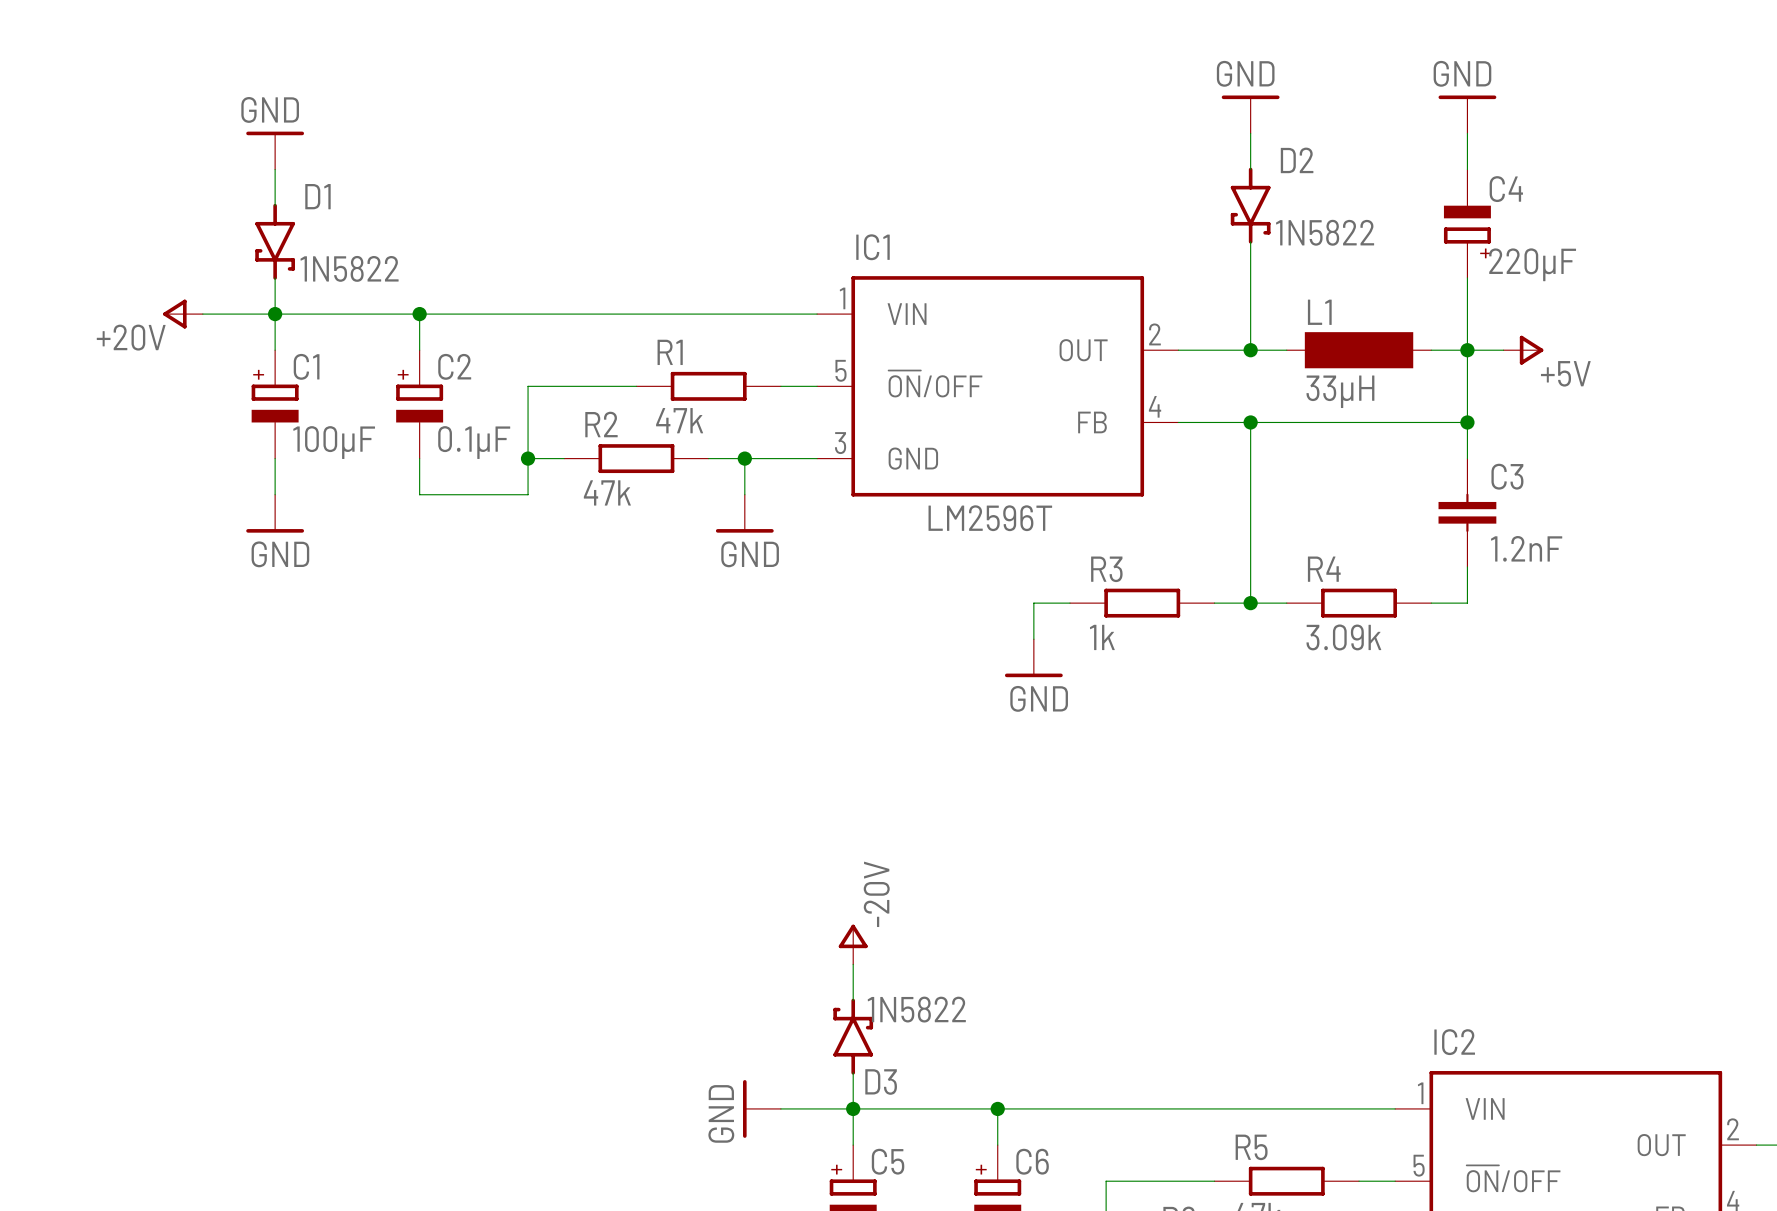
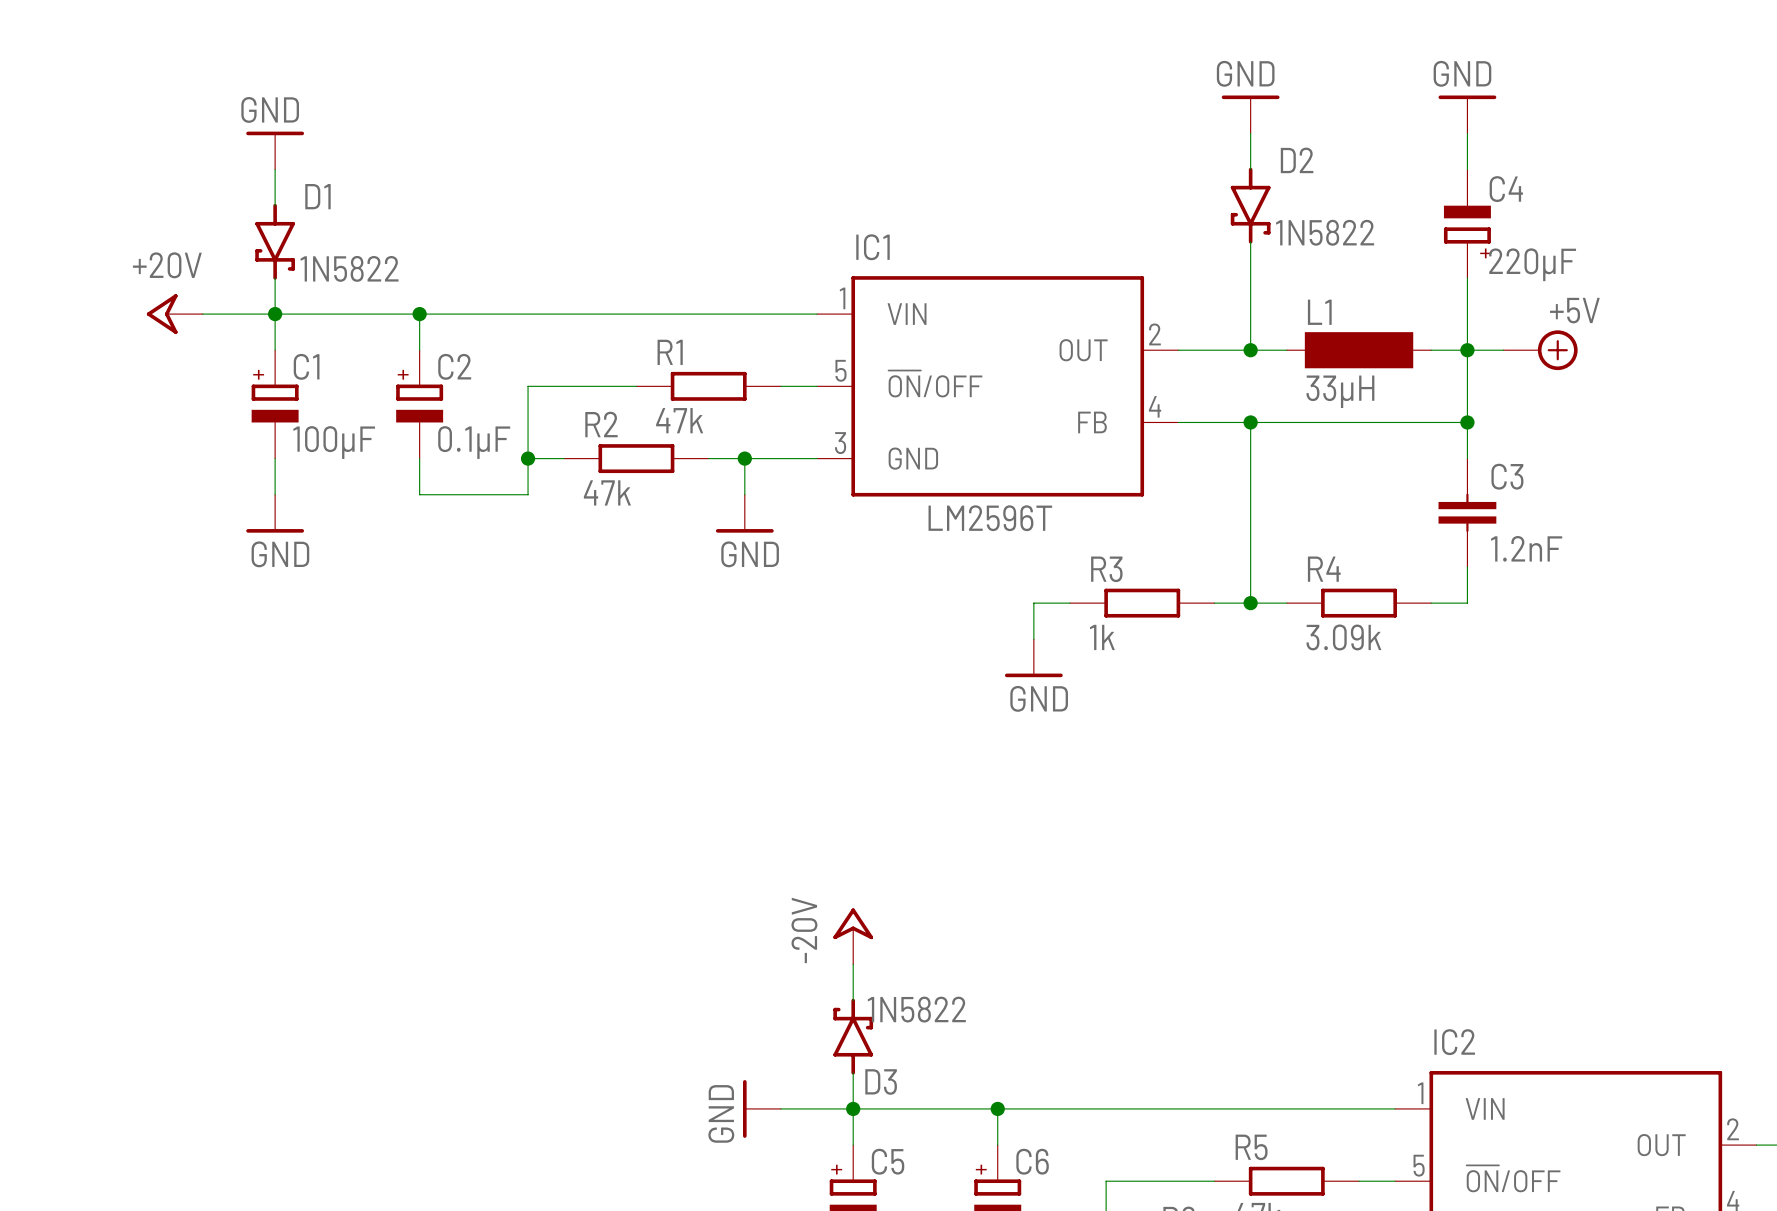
power symbol shape: [163, 299, 203, 329] -> [146, 294, 203, 334]
power symbol text position: +20V (131, 337) -> +20V (167, 265)
power symbol: +5V (1523, 350) -> none
power symbol: none -> +5V (1540, 350)
power symbol text position: -20V (876, 894) -> -20V (804, 930)
power symbol shape: [838, 924, 868, 965] -> [833, 908, 874, 965]

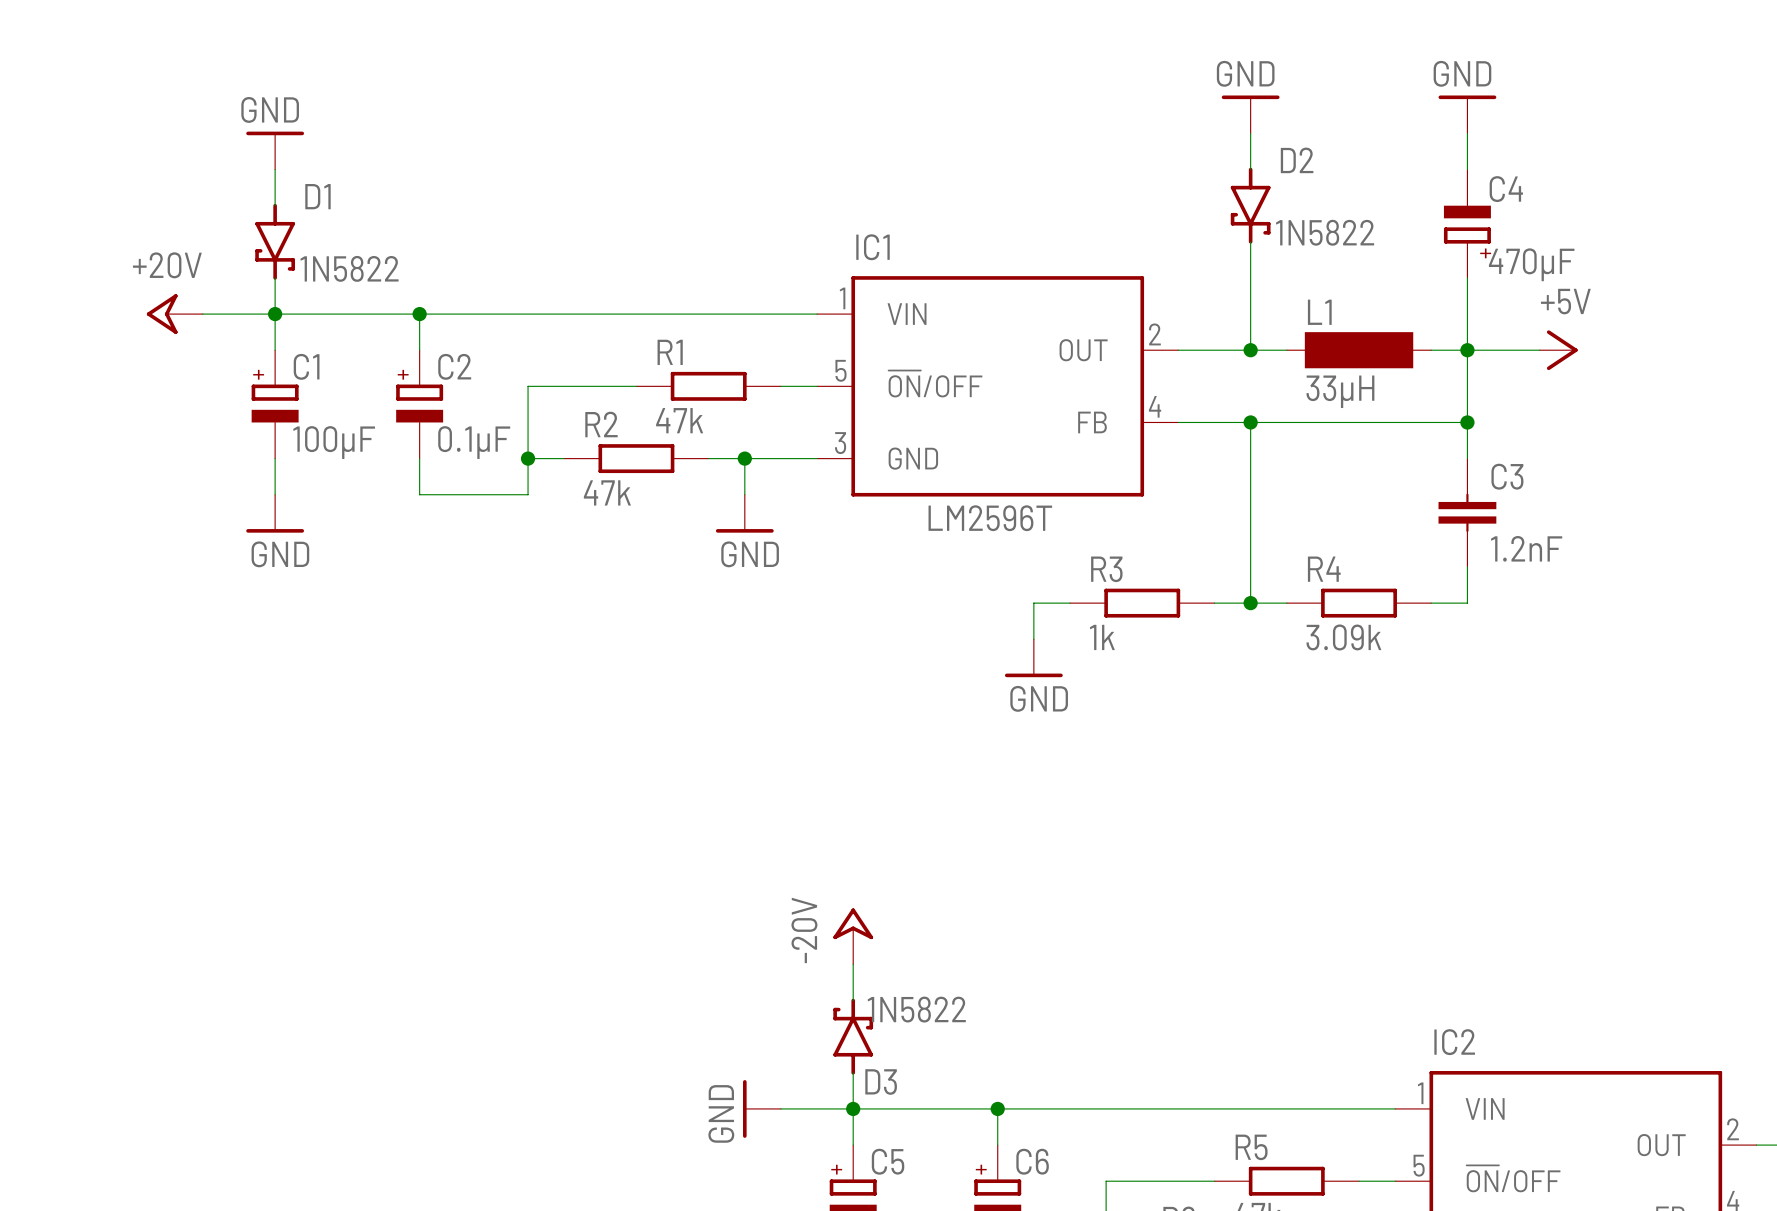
C4 value: 220µF (1532, 264) -> 470µF (1531, 264)
power symbol: +5V (1540, 350) -> none
power symbol: none -> +5V (1558, 350)

